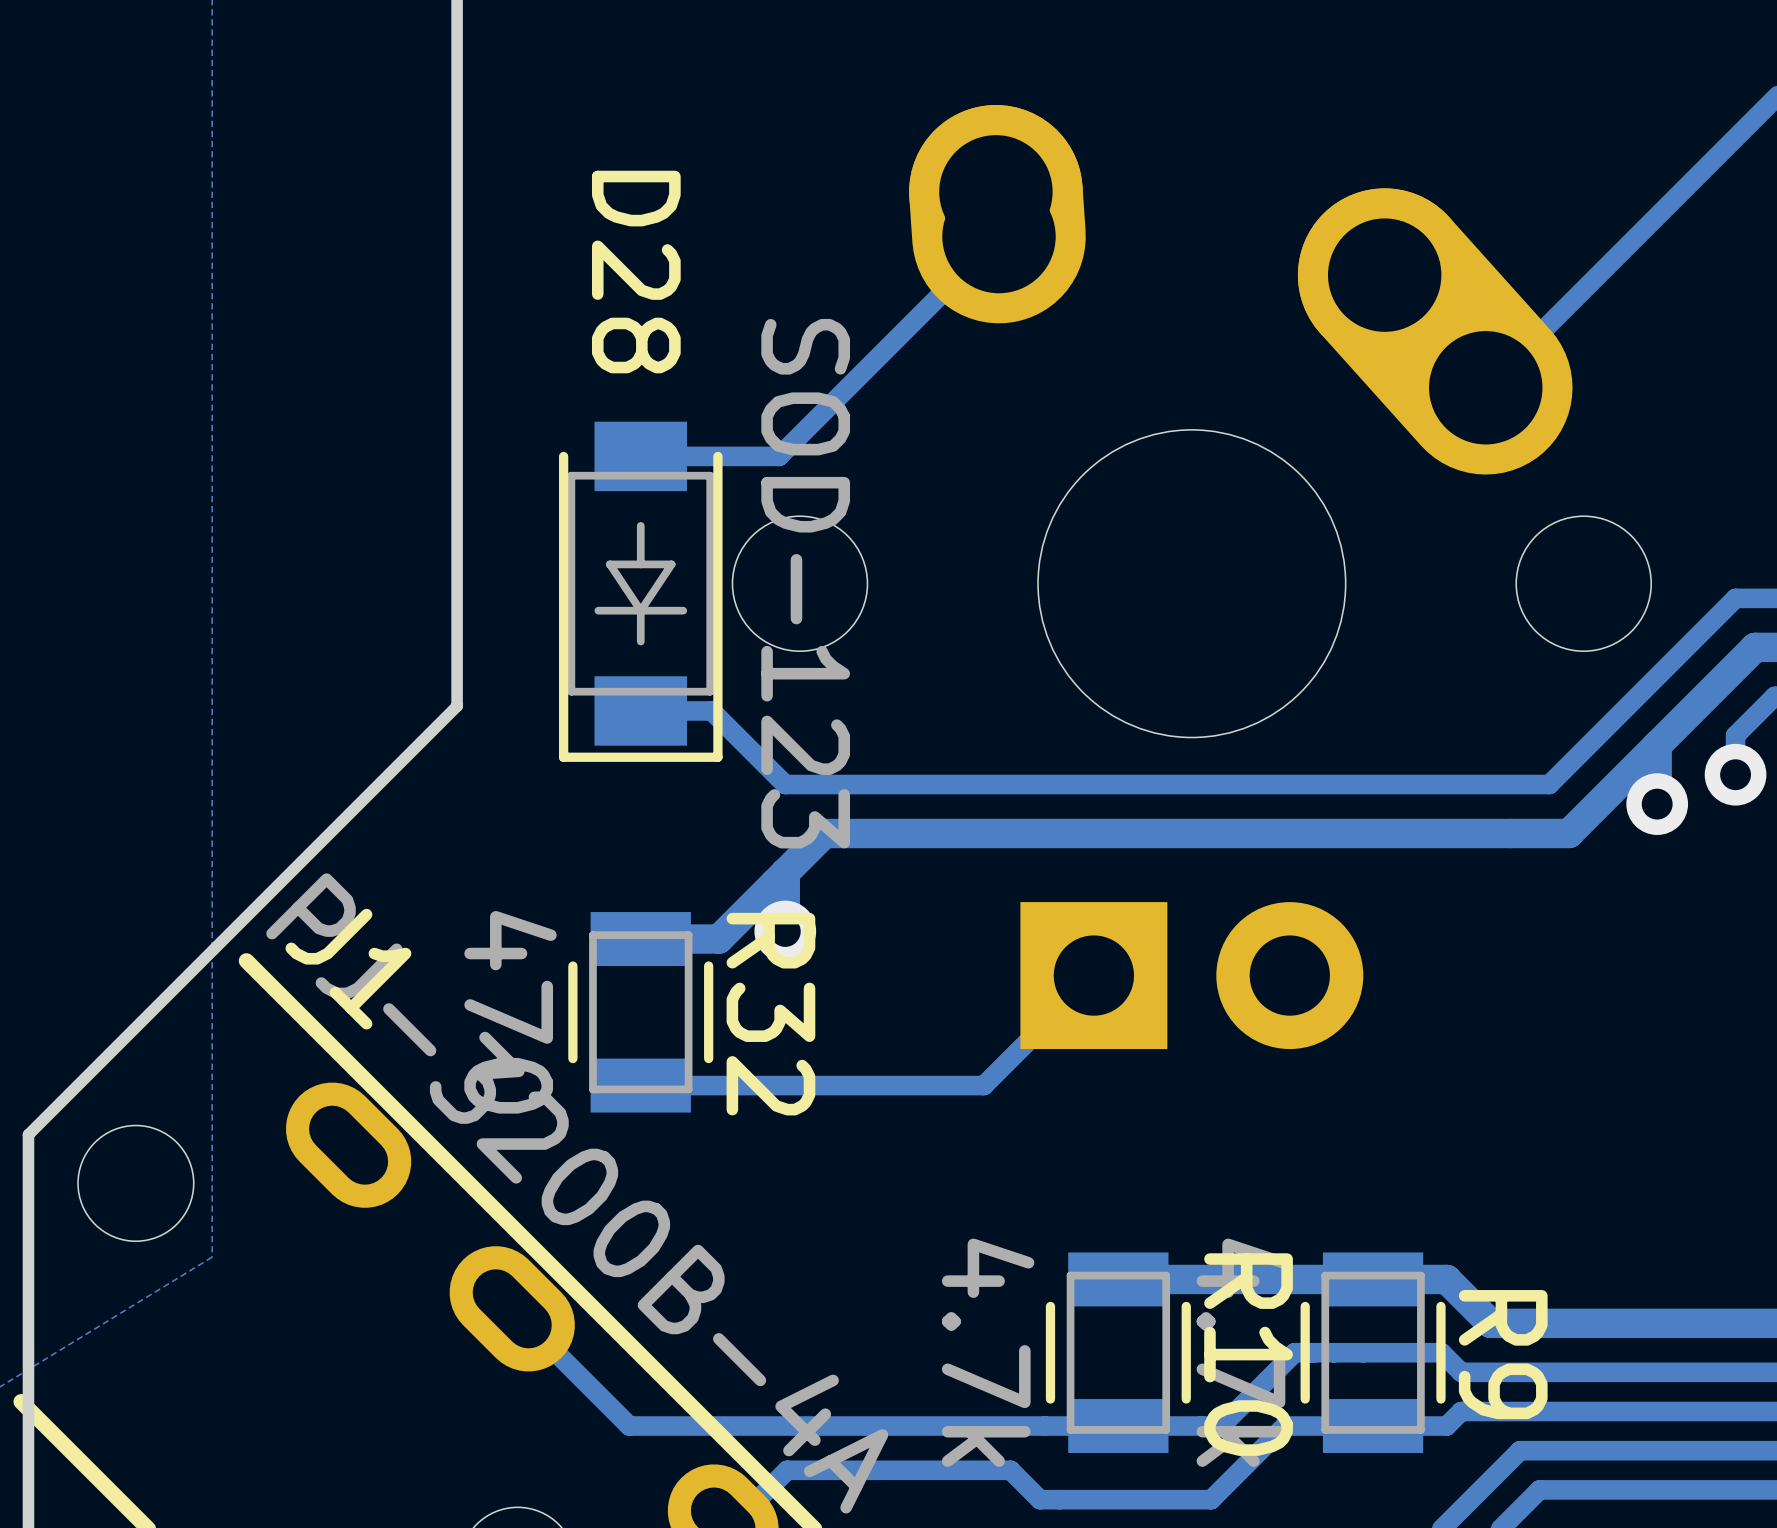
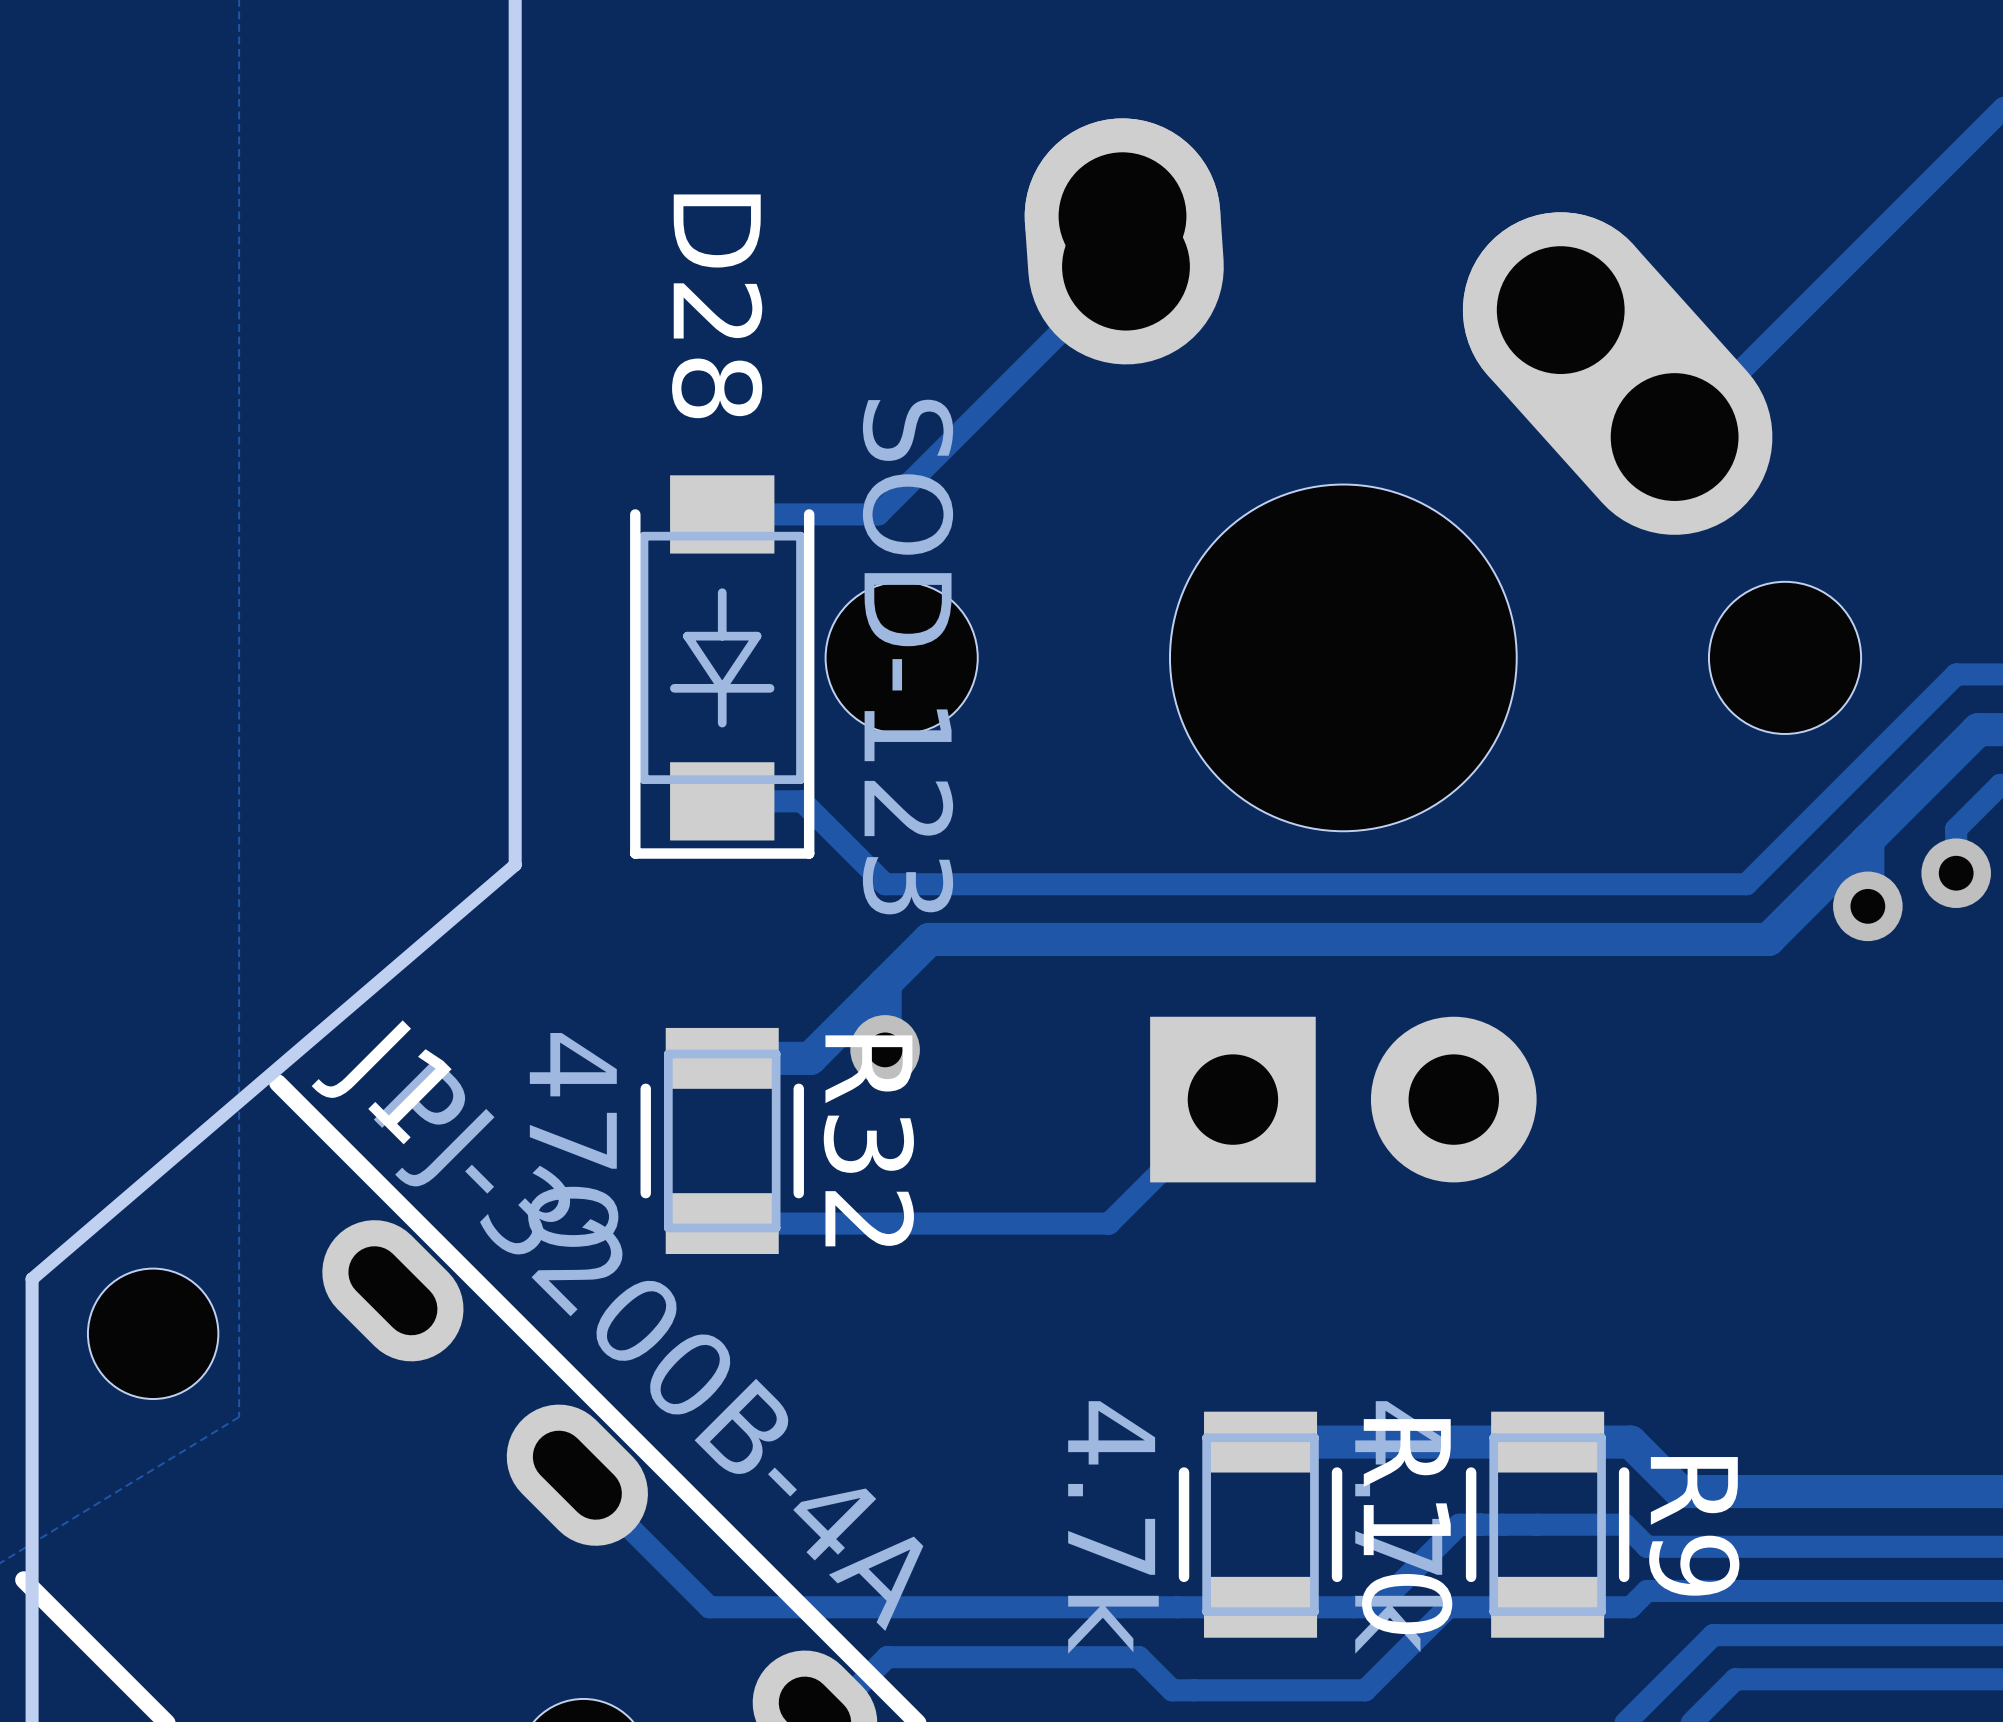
board edge: (457, 706) (28, 1134) -> (515, 795) (515, 864) (32, 1279)

